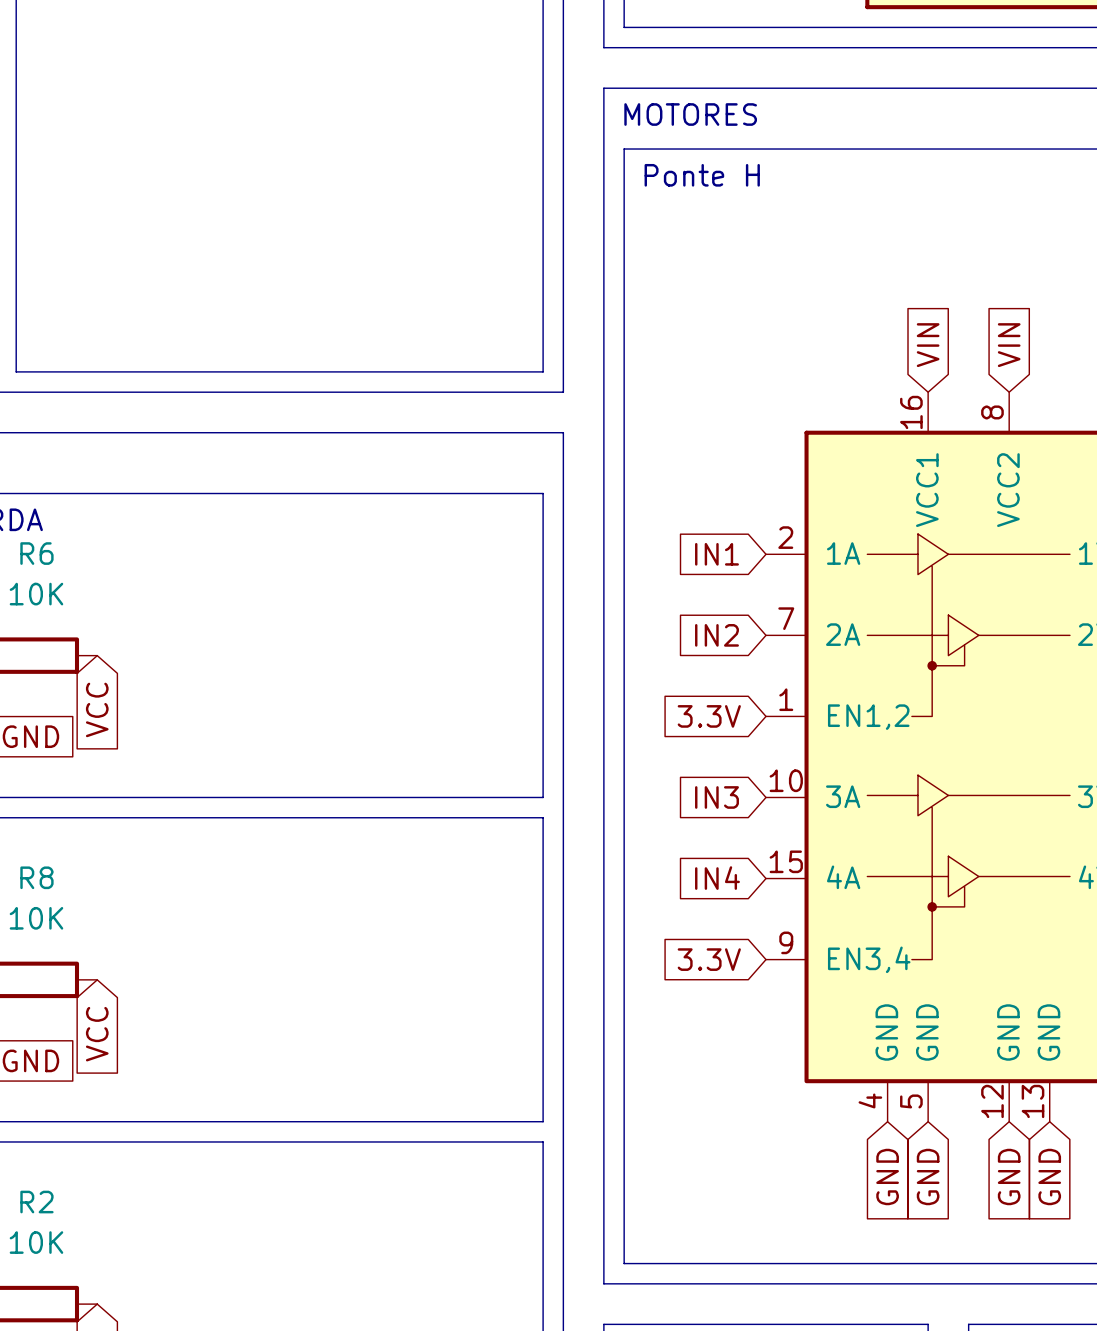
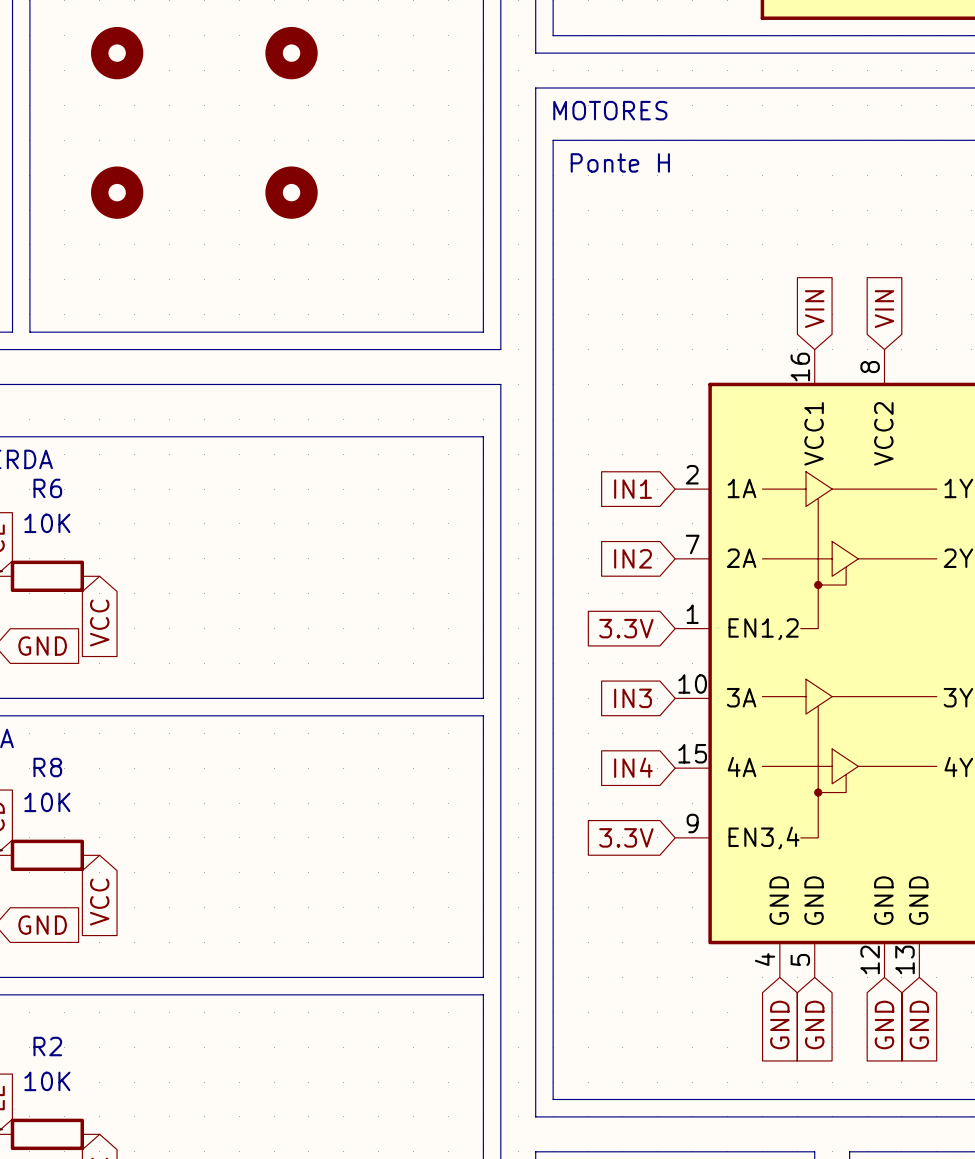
part: none -> (117, 53)
part: none -> (291, 53)
part: none -> (117, 192)
part: none -> (291, 192)

